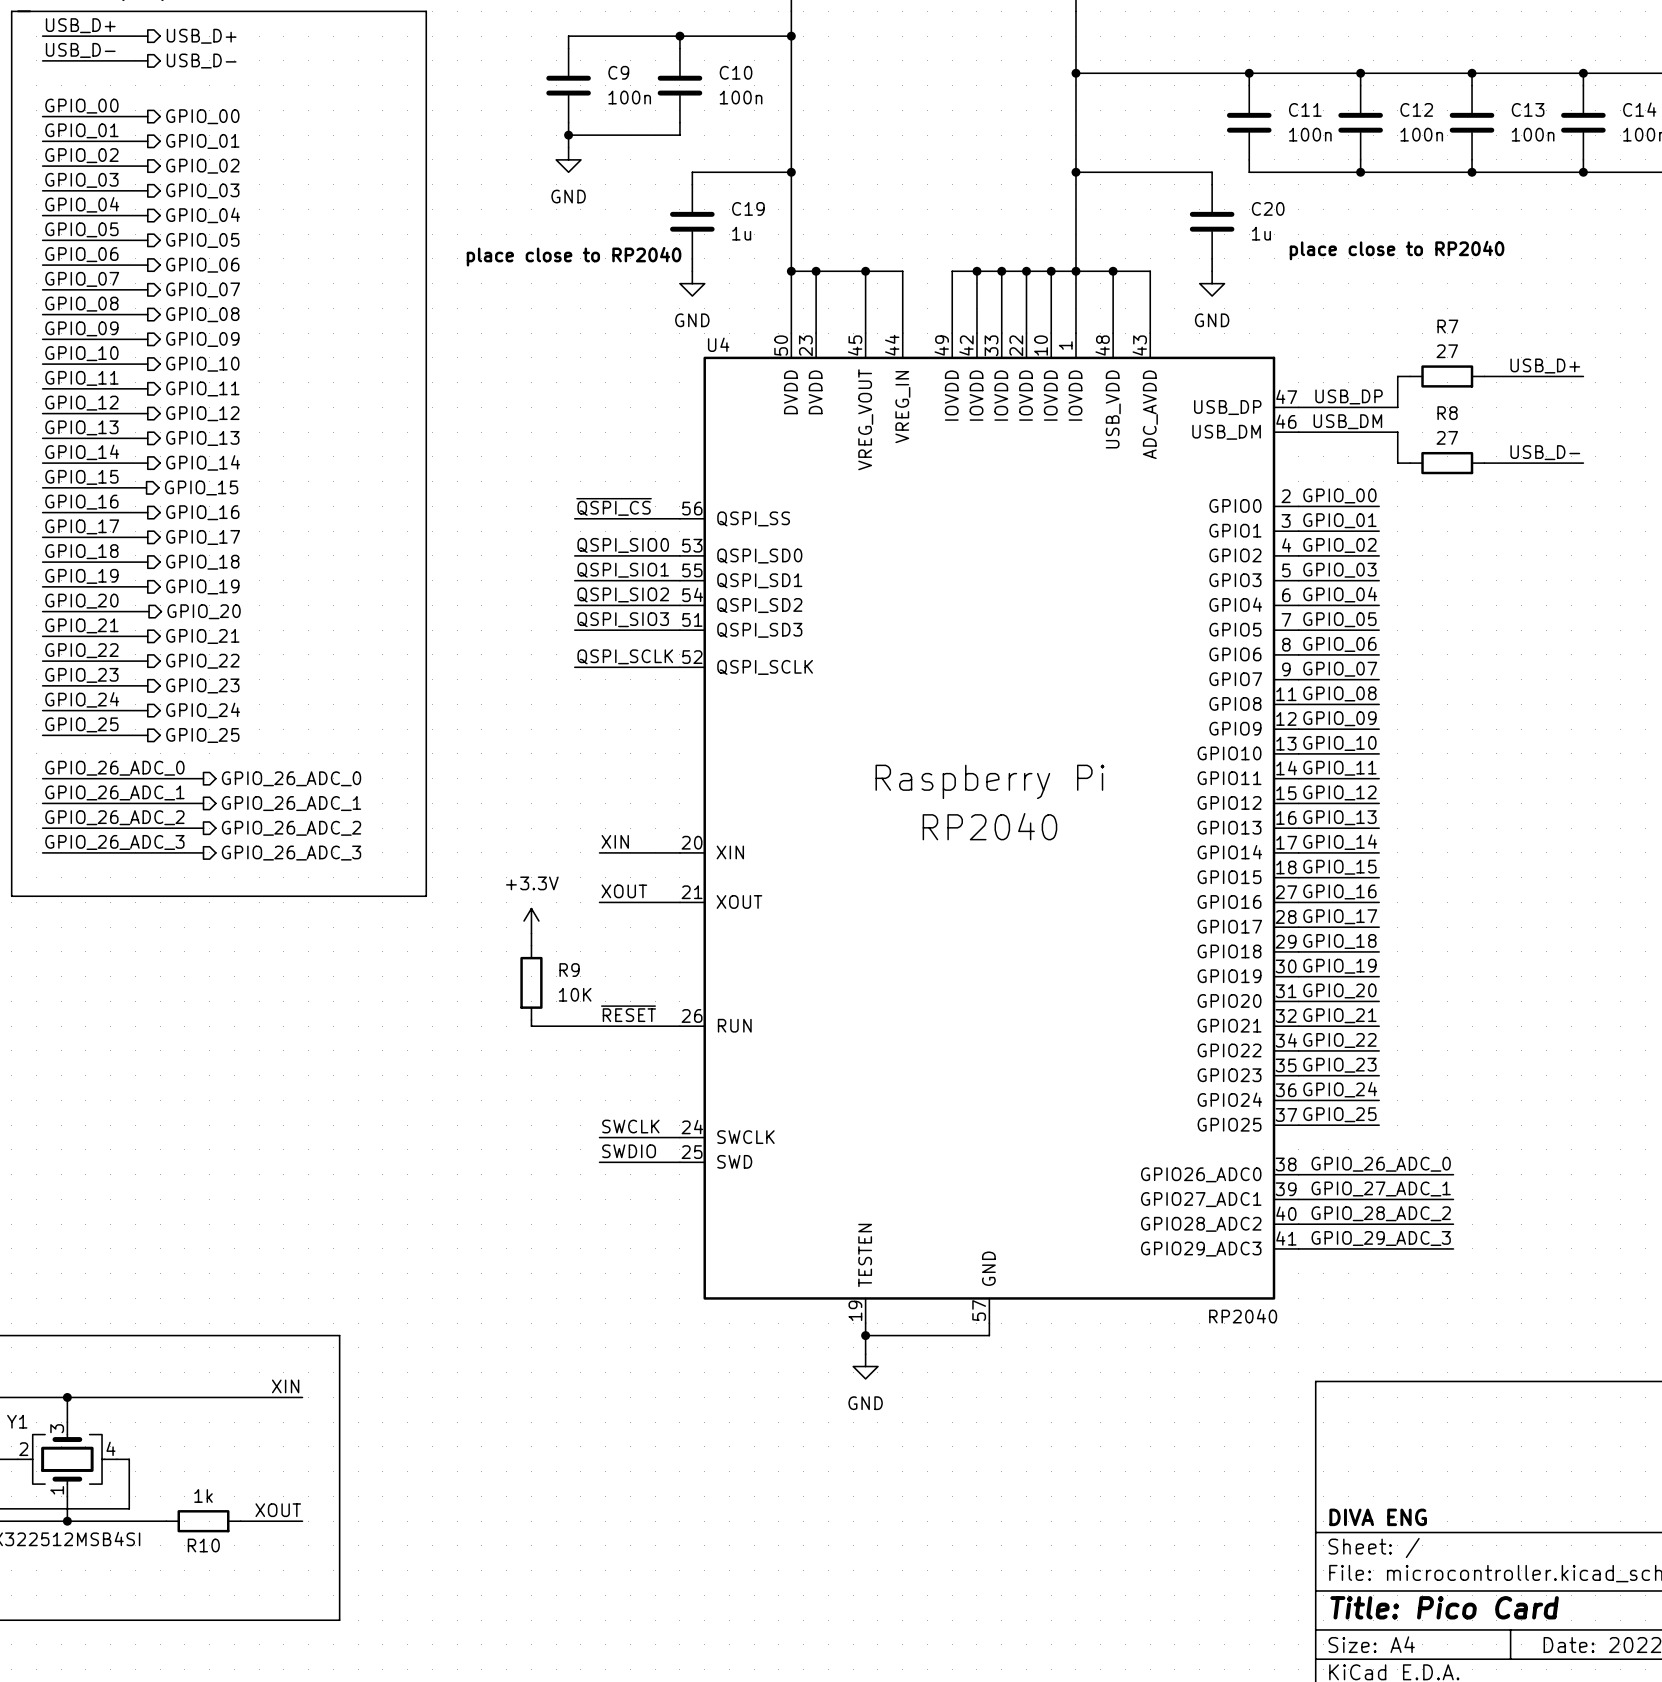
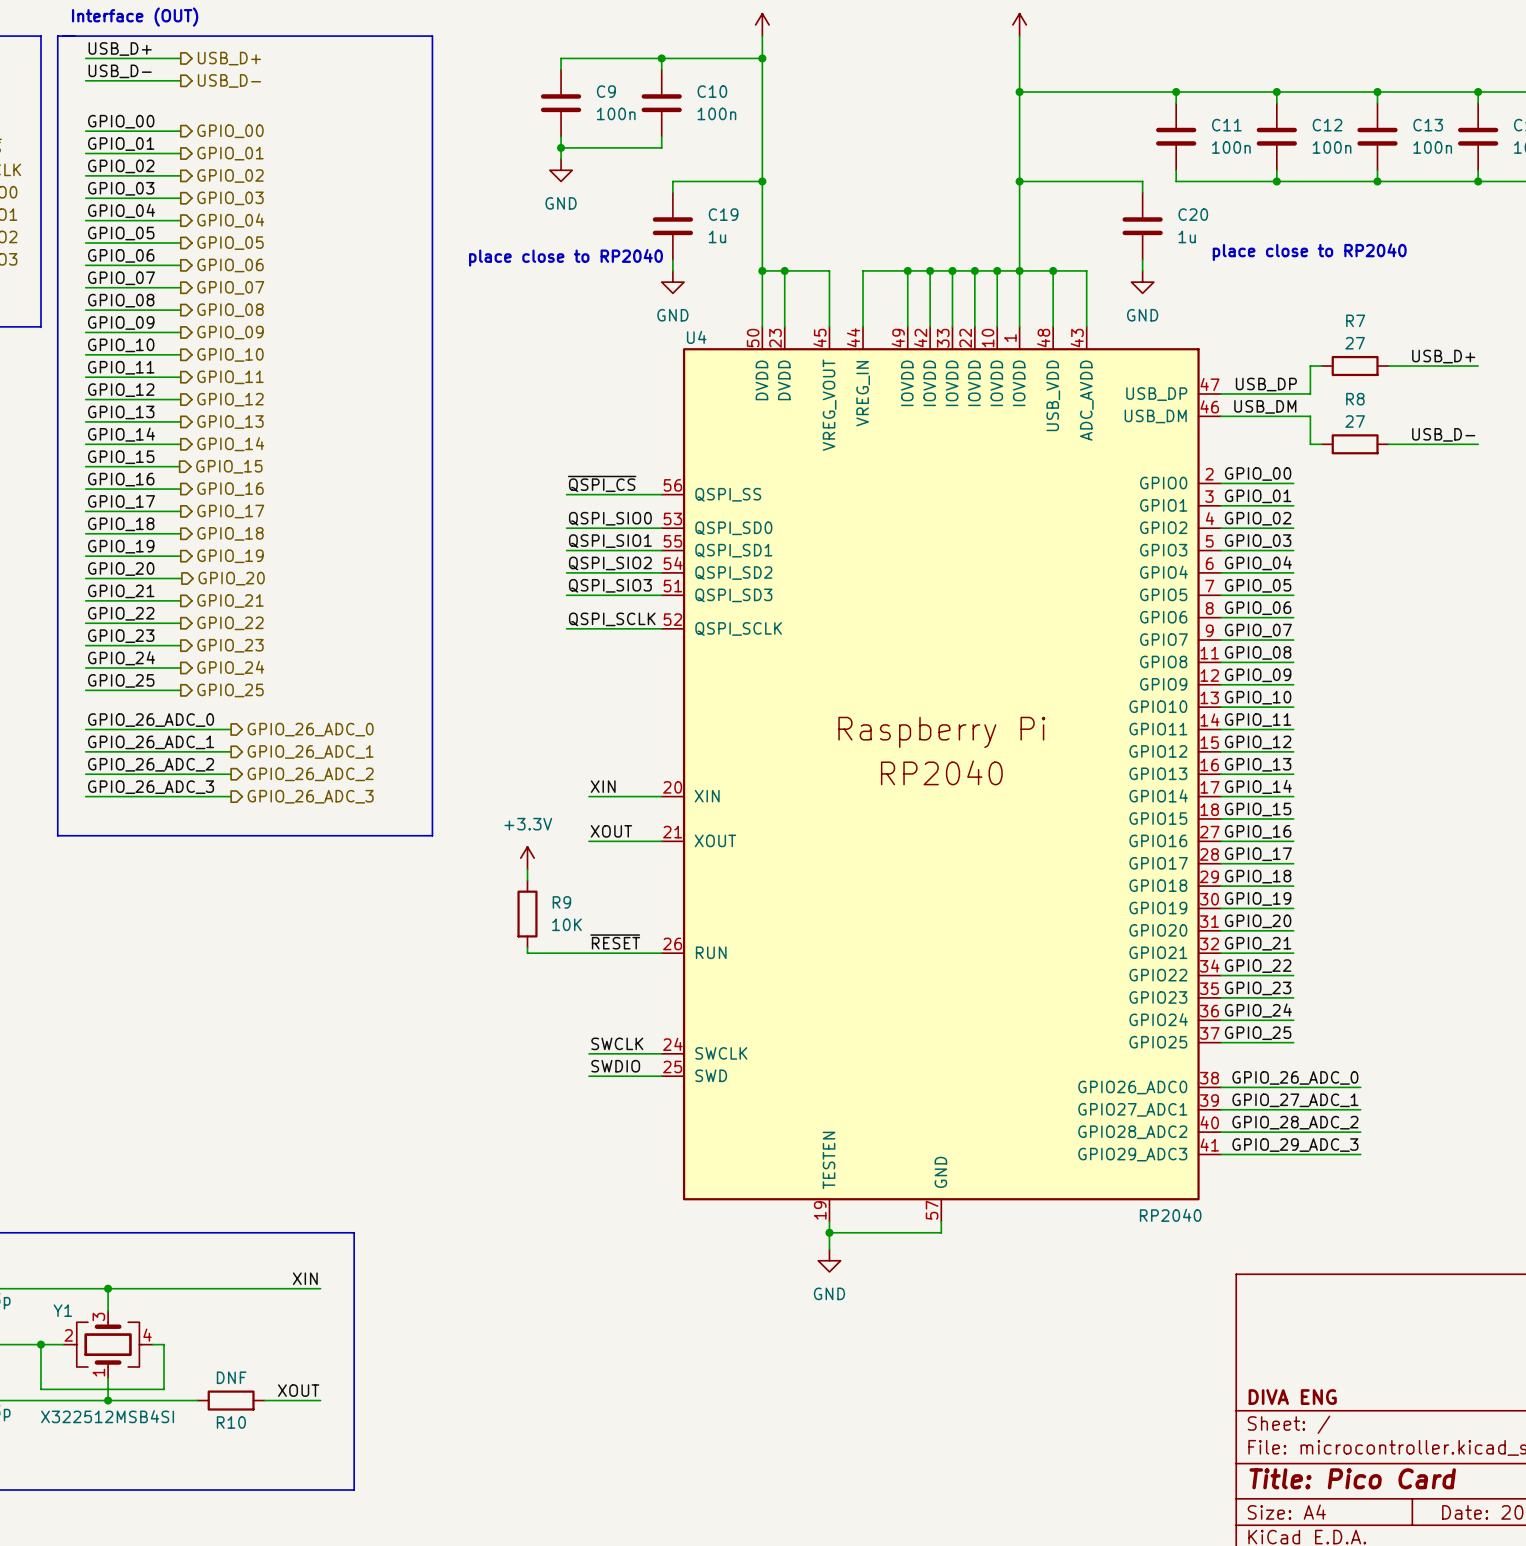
wire: (865, 271) (902, 271) -> (907, 270) (863, 270)
junction: (865, 271) -> none
junction: none -> (907, 270)
R10 value: 1k (203, 1496) -> DNF (231, 1377)

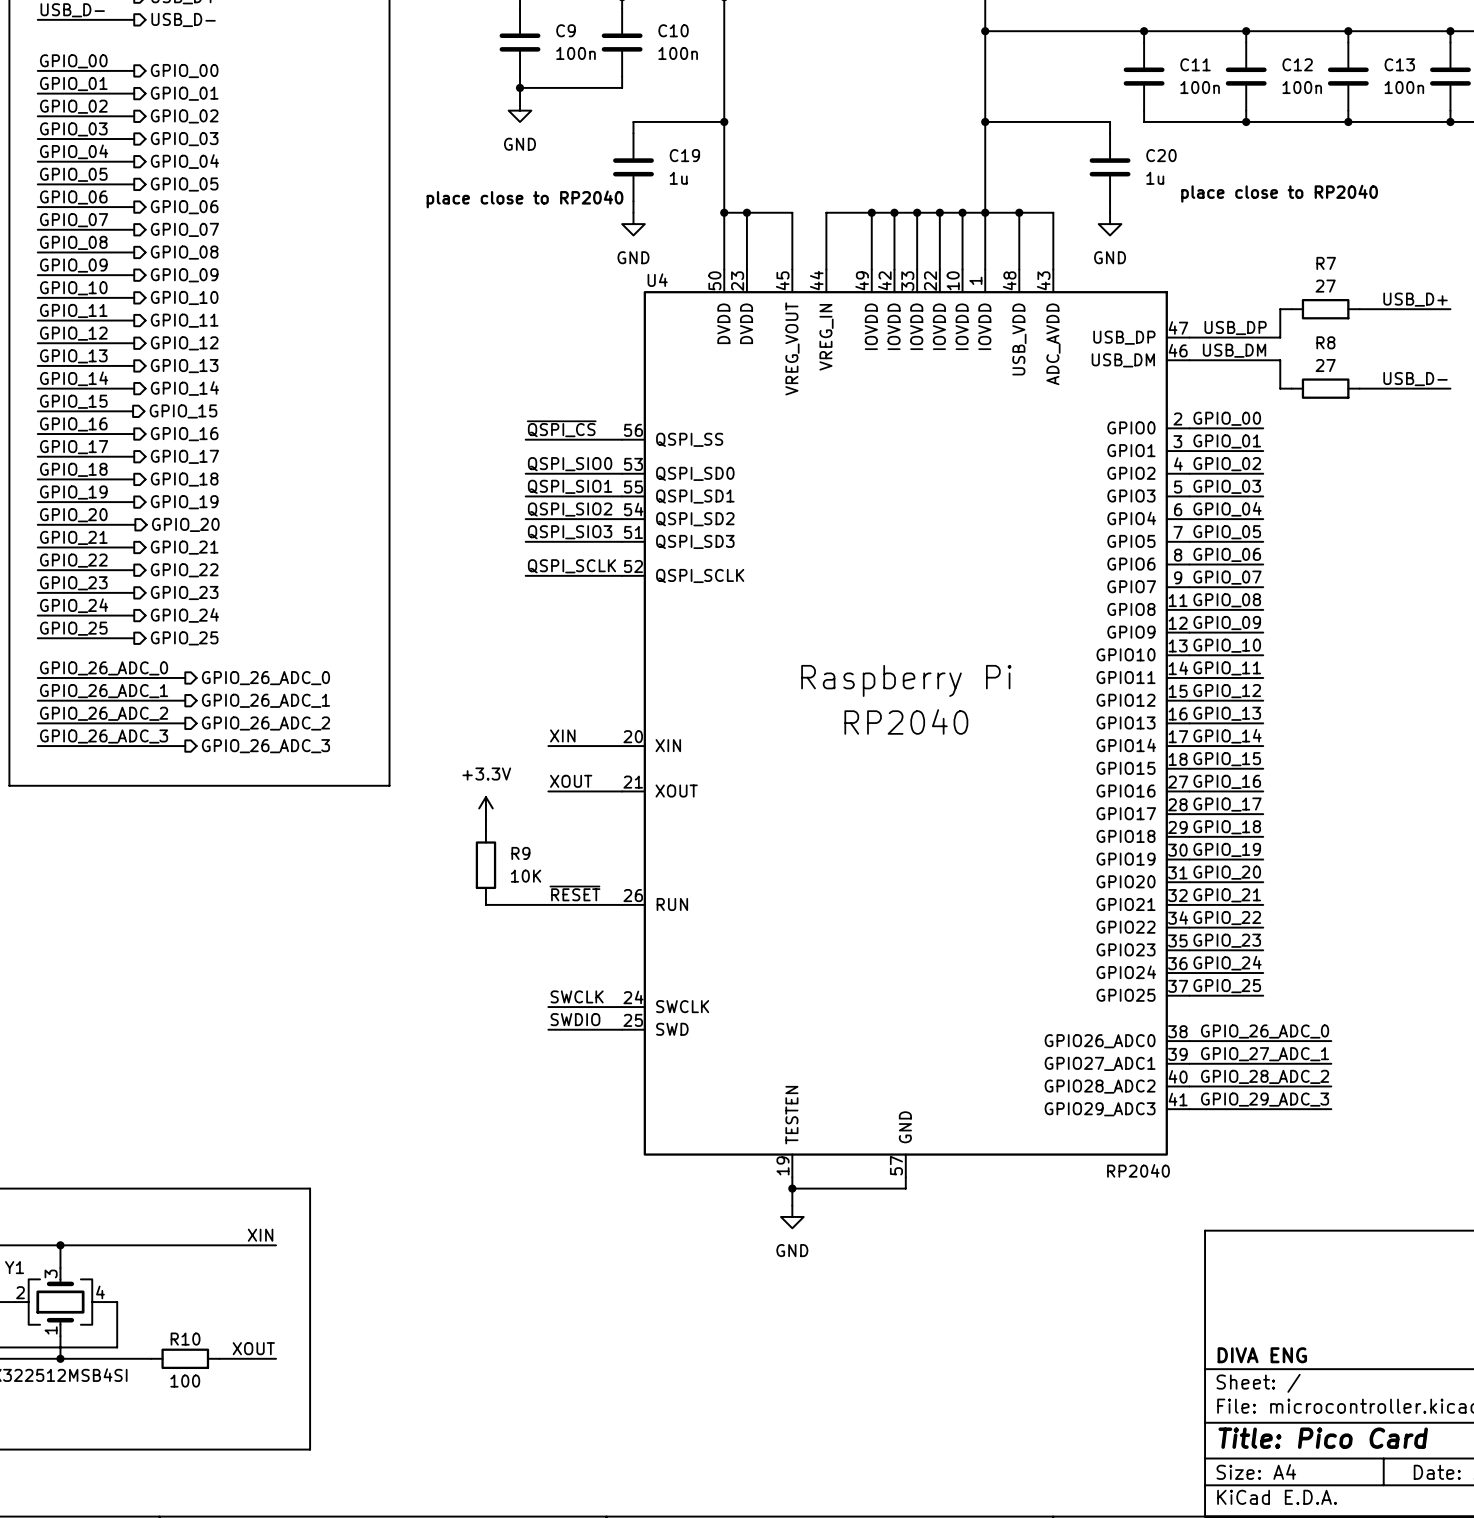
R10 value: DNF (231, 1377) -> 100 (185, 1381)
R10 name position: R10 (231, 1422) -> R10 (185, 1339)

